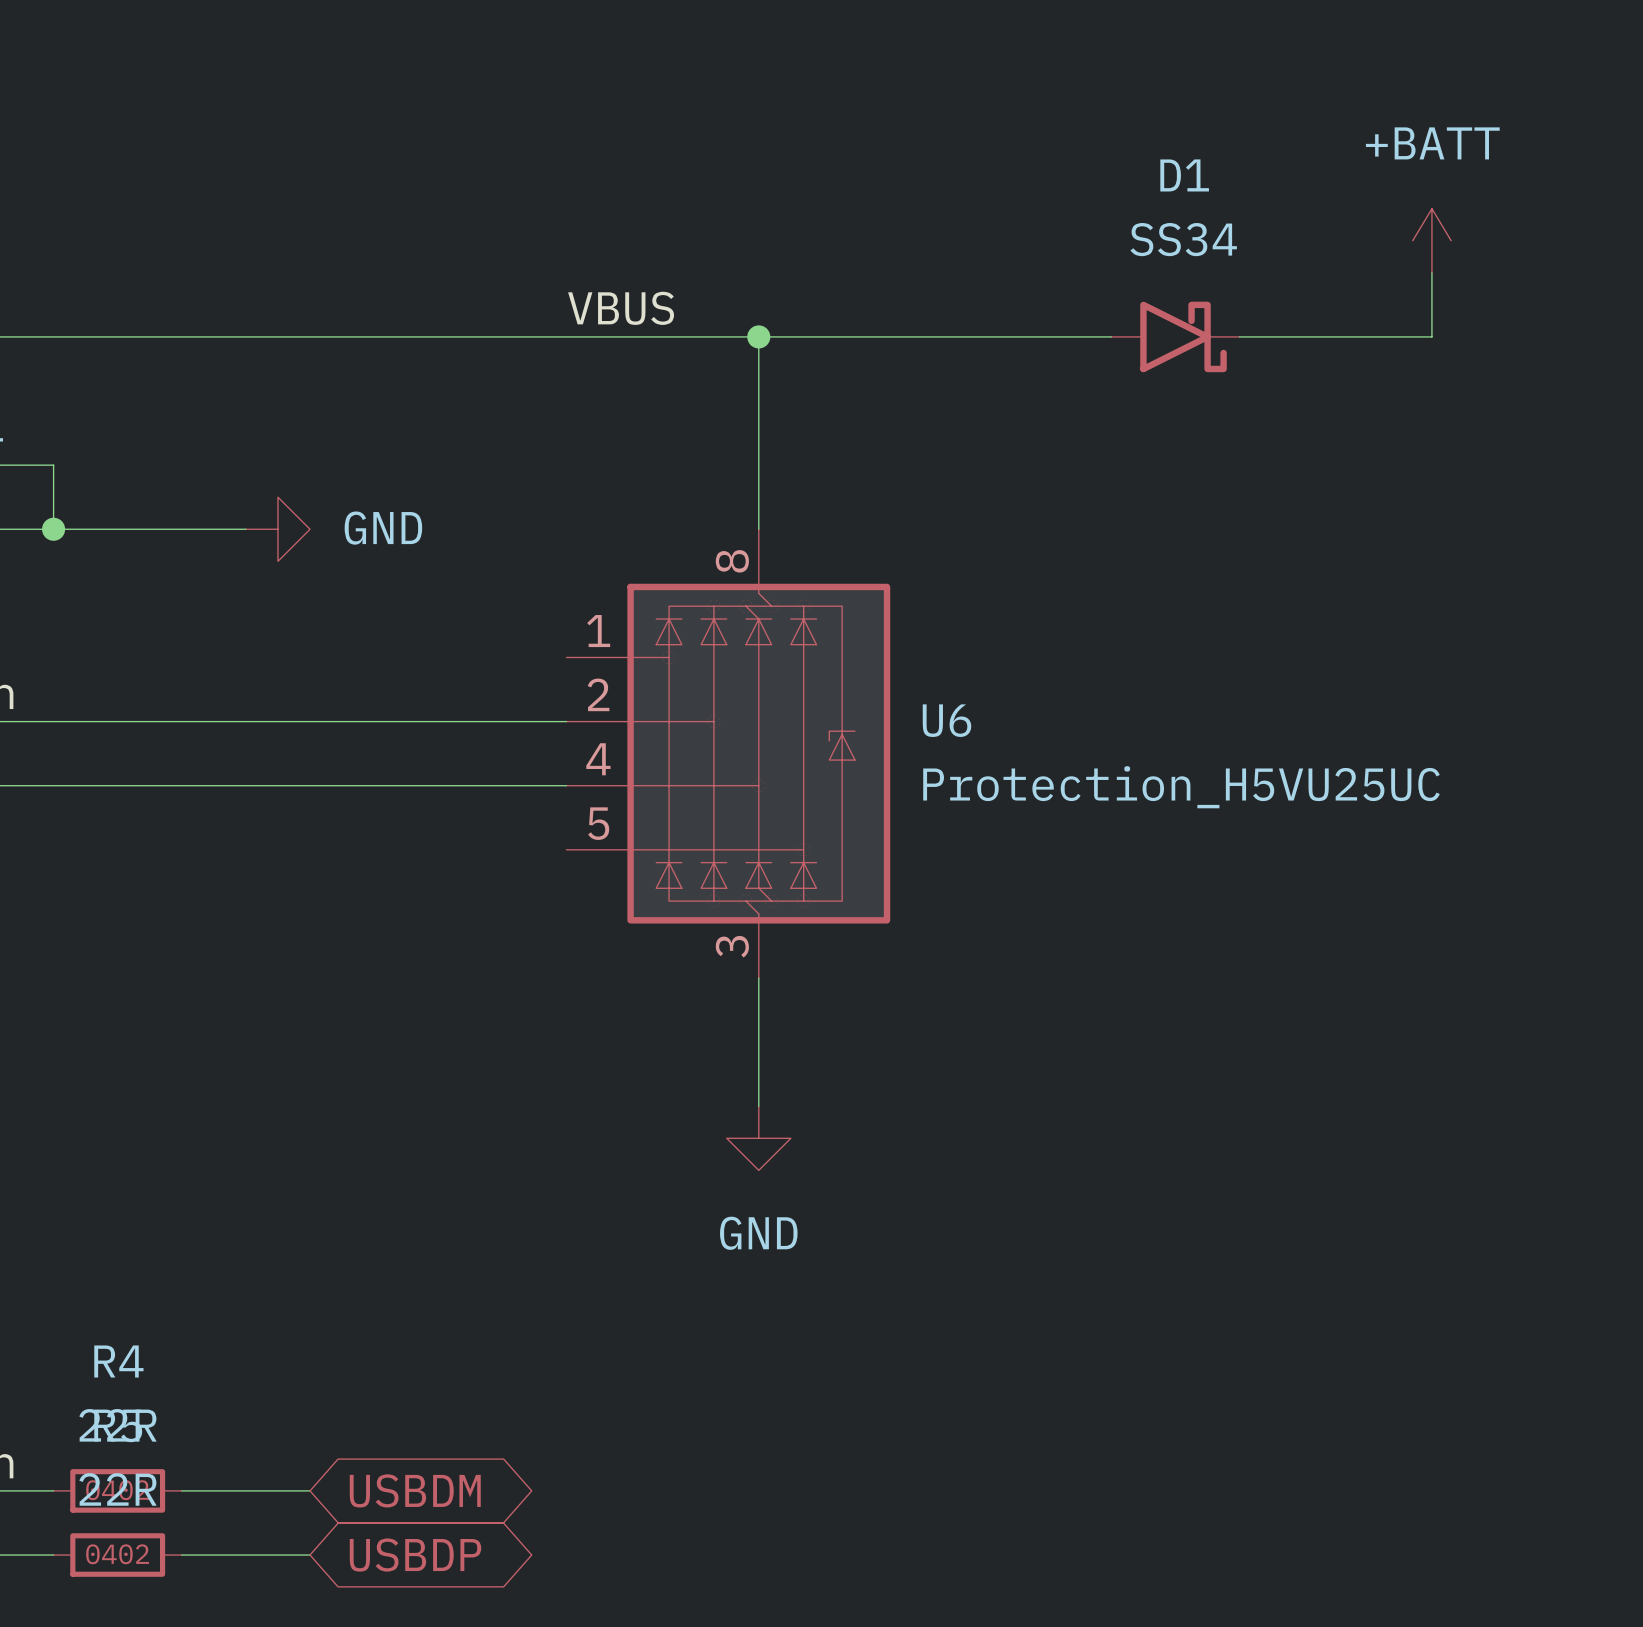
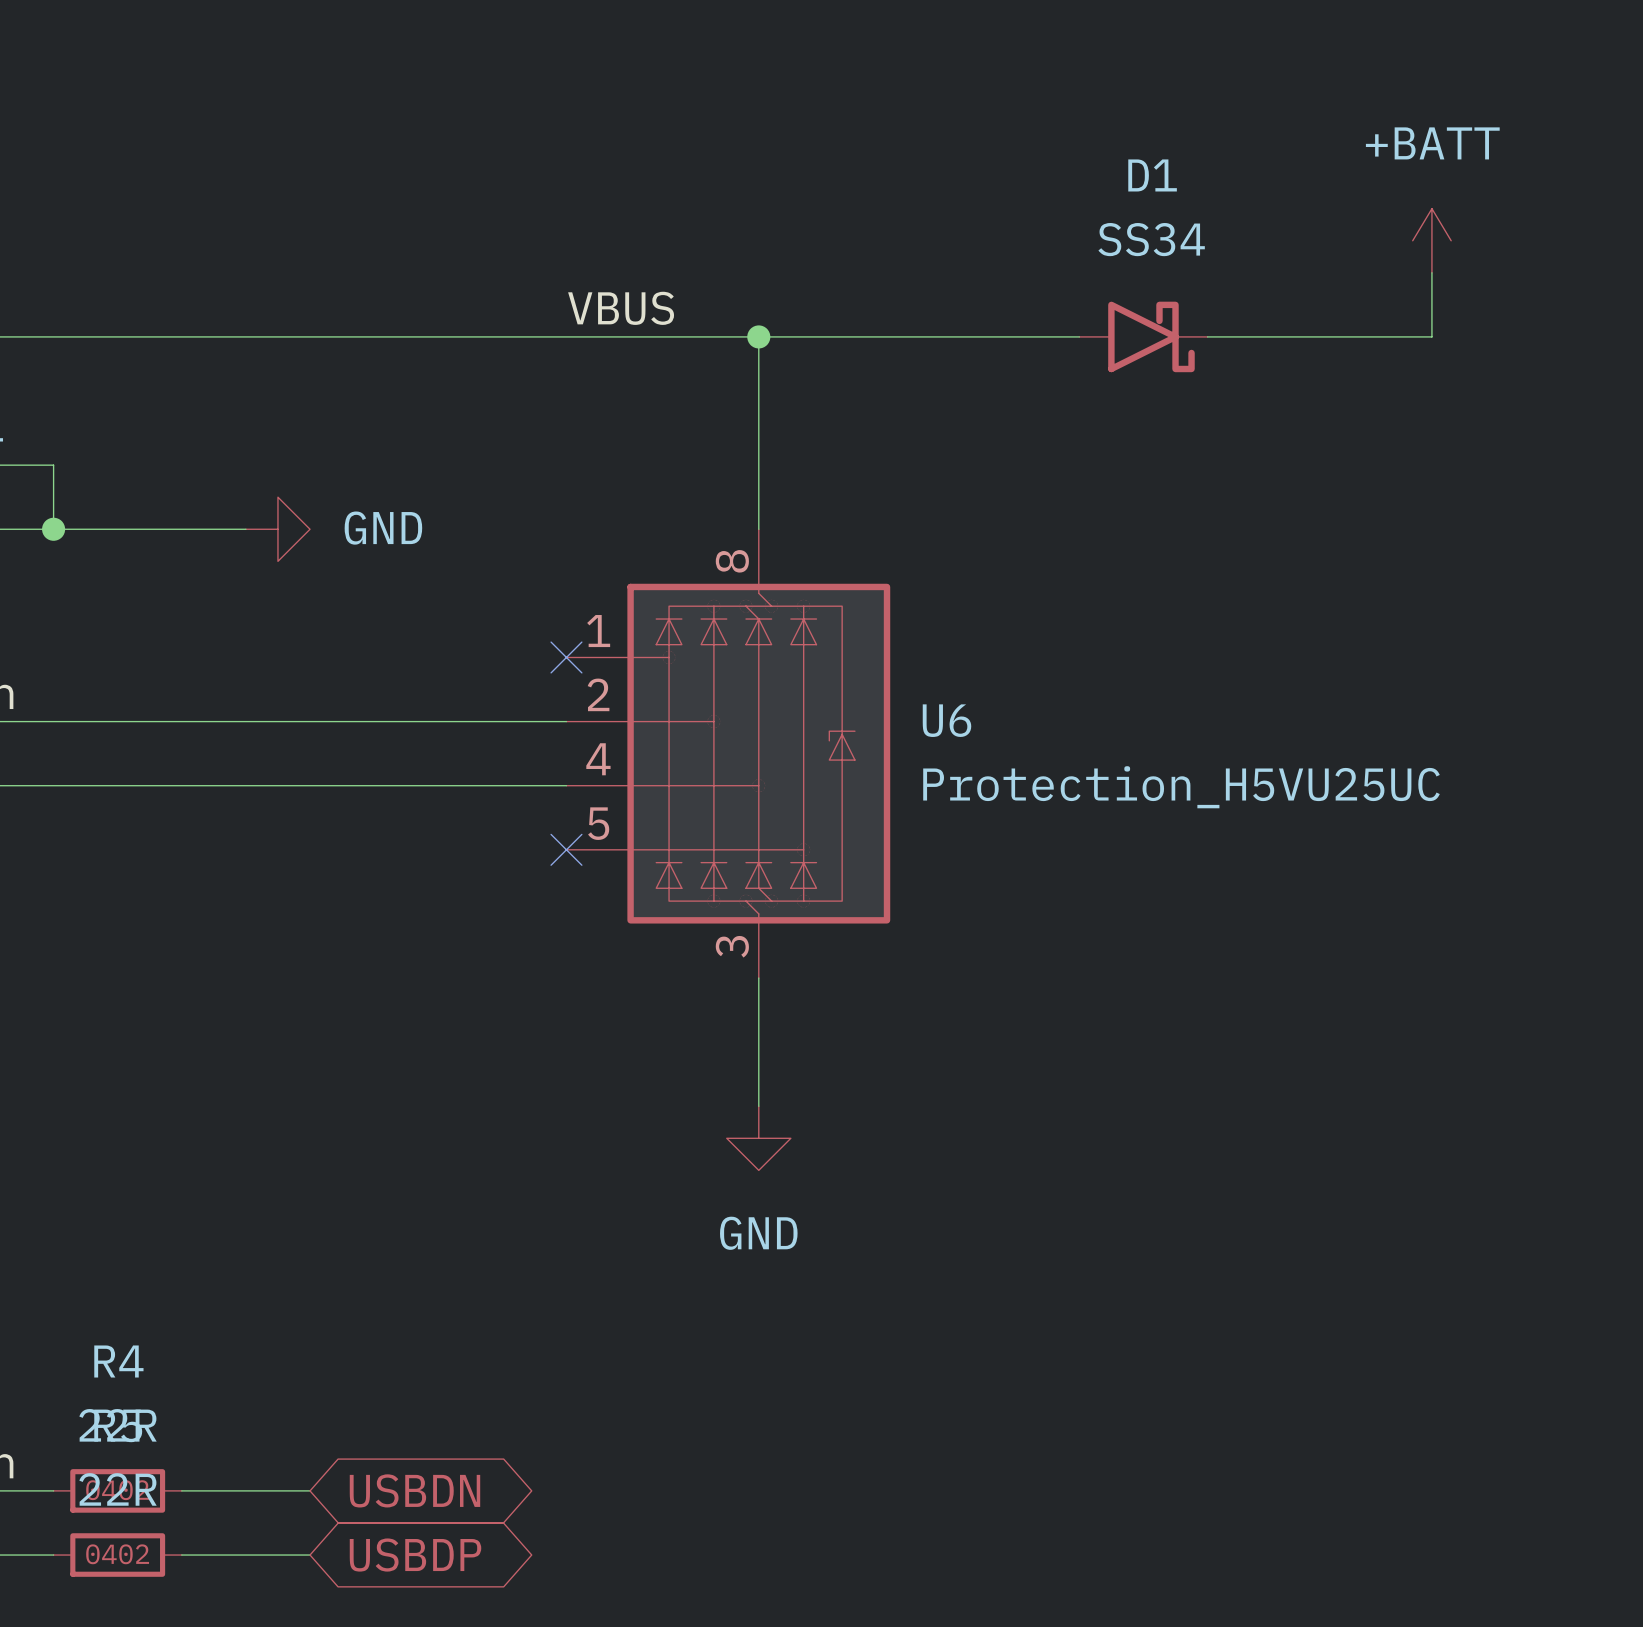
D1 position: (1175, 336) -> (1143, 336)
no-connect mark: none -> (566, 657)
no-connect mark: none -> (566, 849)
global label: USBDM (415, 1490) -> USBDN (414, 1490)

